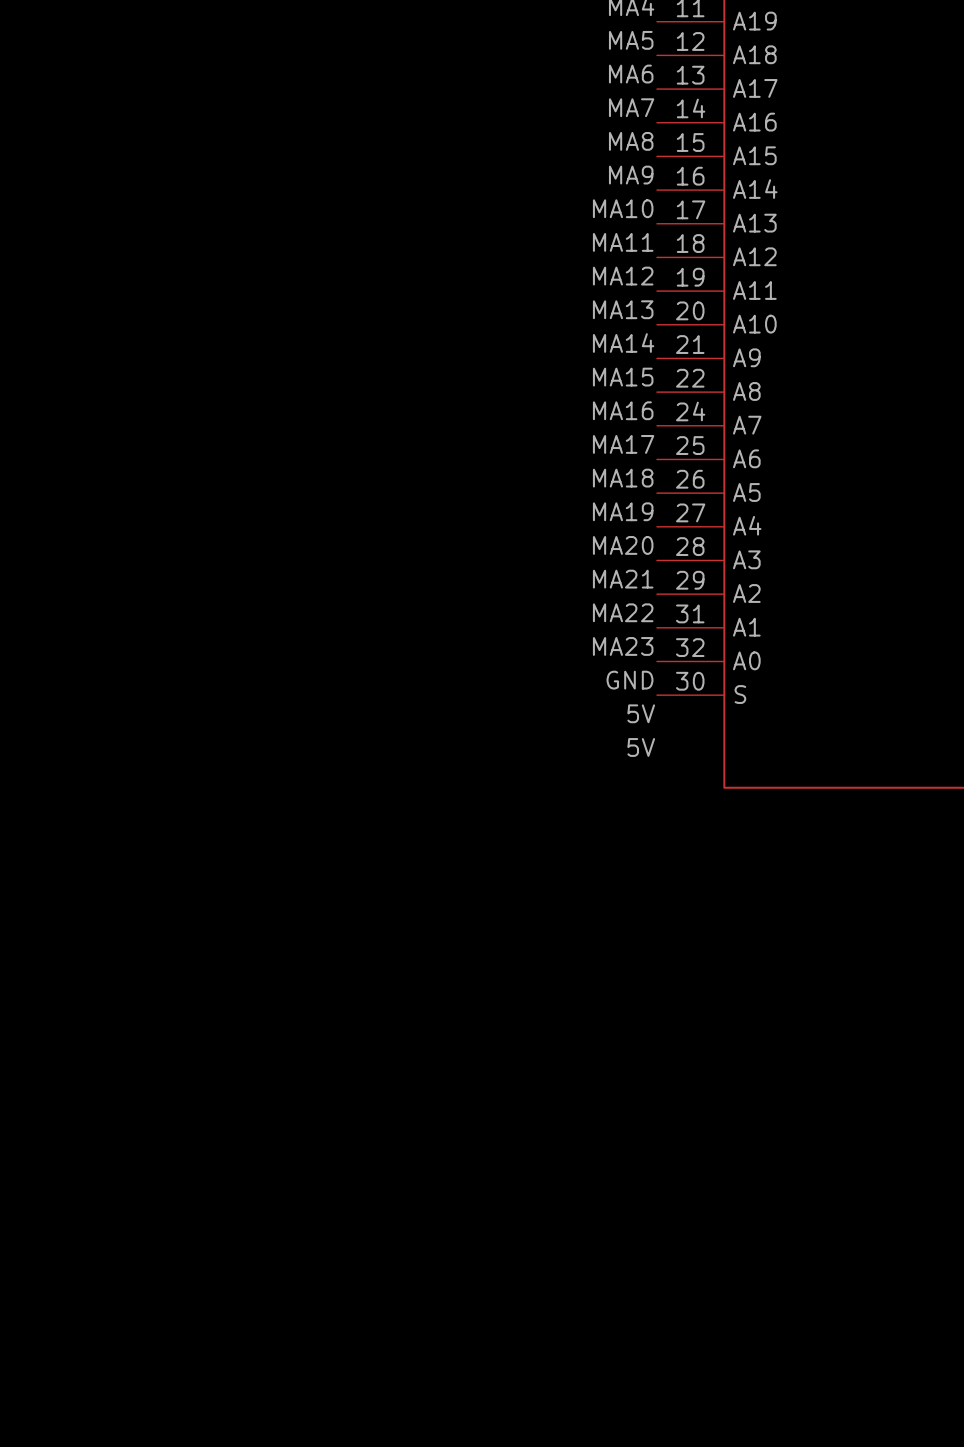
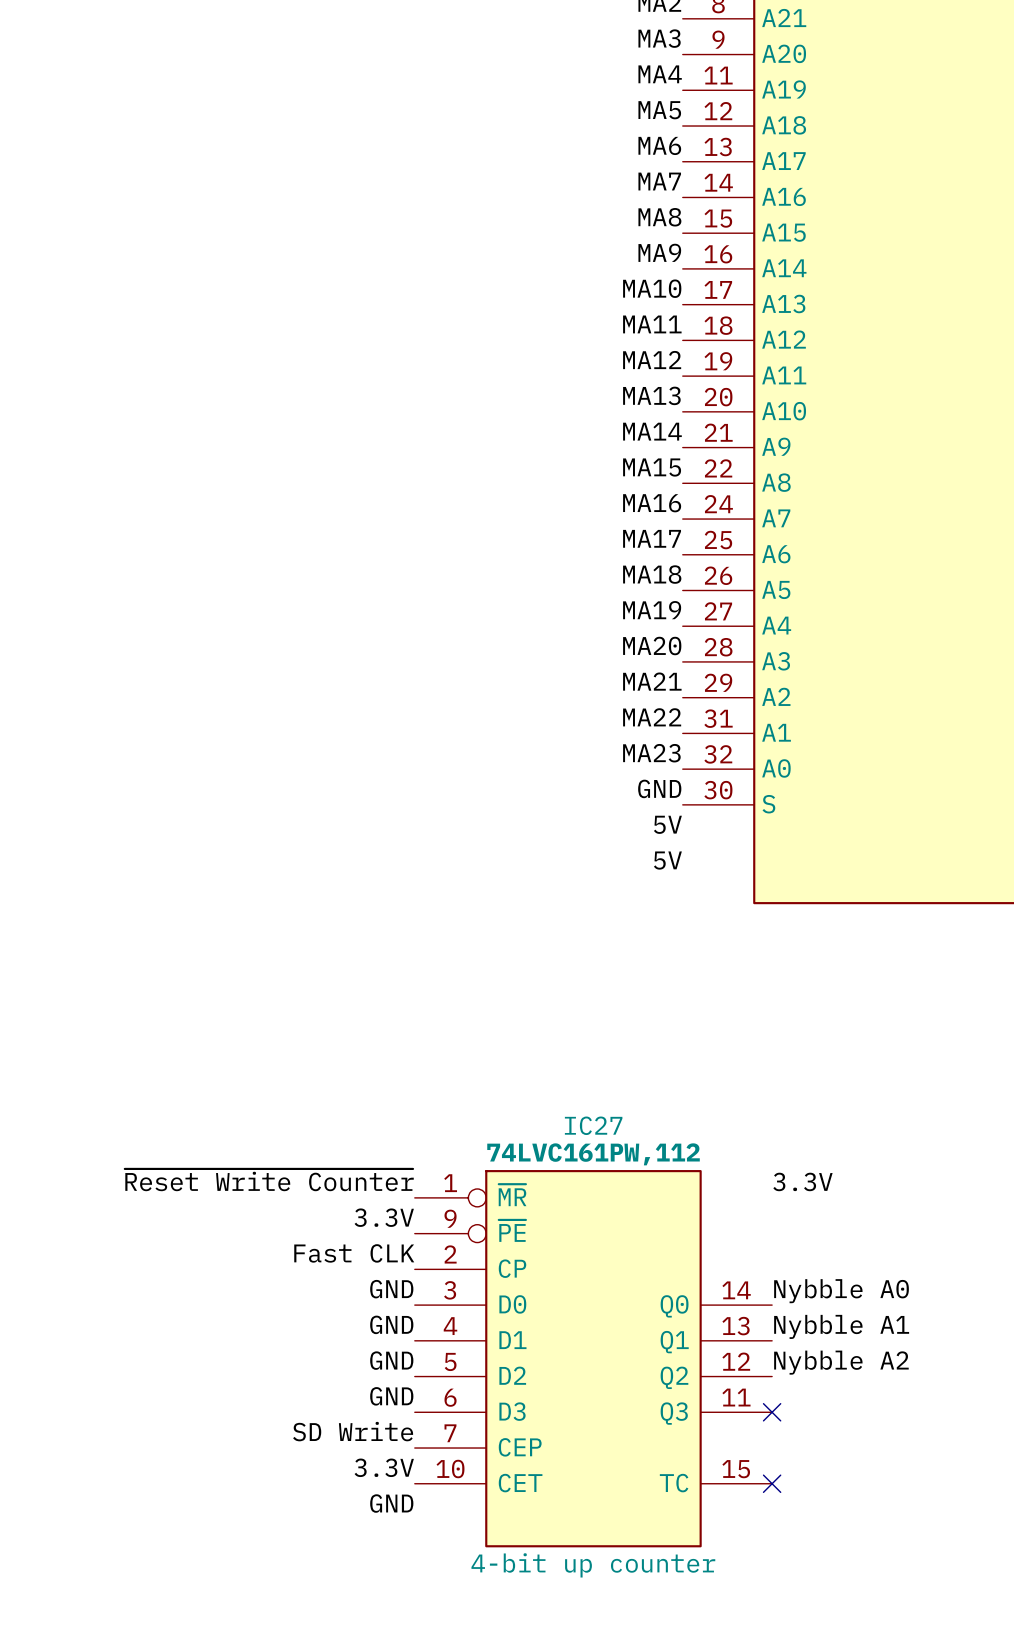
label: none -> ~{Reset Write Counter} (269, 1180)
label: none -> 3.3V (802, 1181)
label: none -> 3.3V (384, 1217)
label: none -> Fast CLK (354, 1253)
label: none -> GND (391, 1289)
label: none -> Nybble A0 (841, 1291)
label: none -> GND (391, 1324)
label: none -> Nybble A1 (841, 1326)
IC27: none -> 74LVC161PW,112 (593, 1358)
label: none -> GND (391, 1360)
label: none -> Nybble A2 (841, 1362)
label: none -> GND (391, 1396)
no-connect mark: none -> (772, 1412)
label: none -> SD Write (353, 1431)
label: none -> 3.3V (384, 1467)
no-connect mark: none -> (772, 1483)
label: none -> GND (391, 1503)

